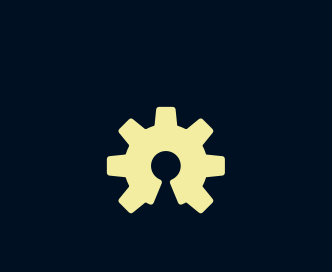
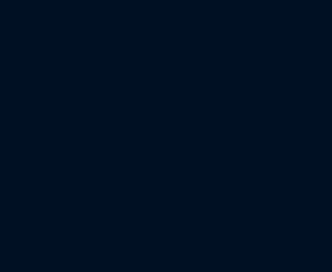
drawing: [106, 106, 225, 214] -> none

